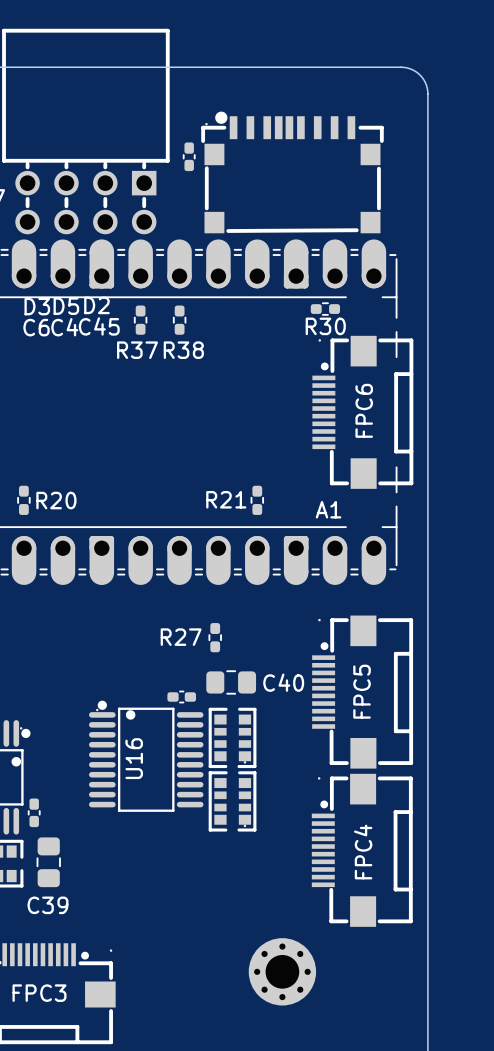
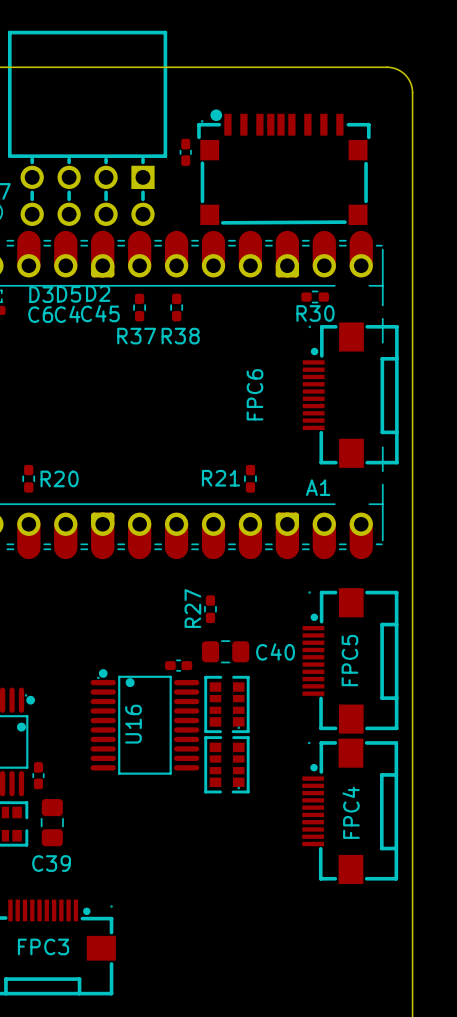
FPC6 name position: FPC6 (364, 410) -> FPC6 (254, 394)
R27 name rotation: 0° (181, 637) -> 90° counterclockwise (192, 608)
part: (282, 971) -> none

